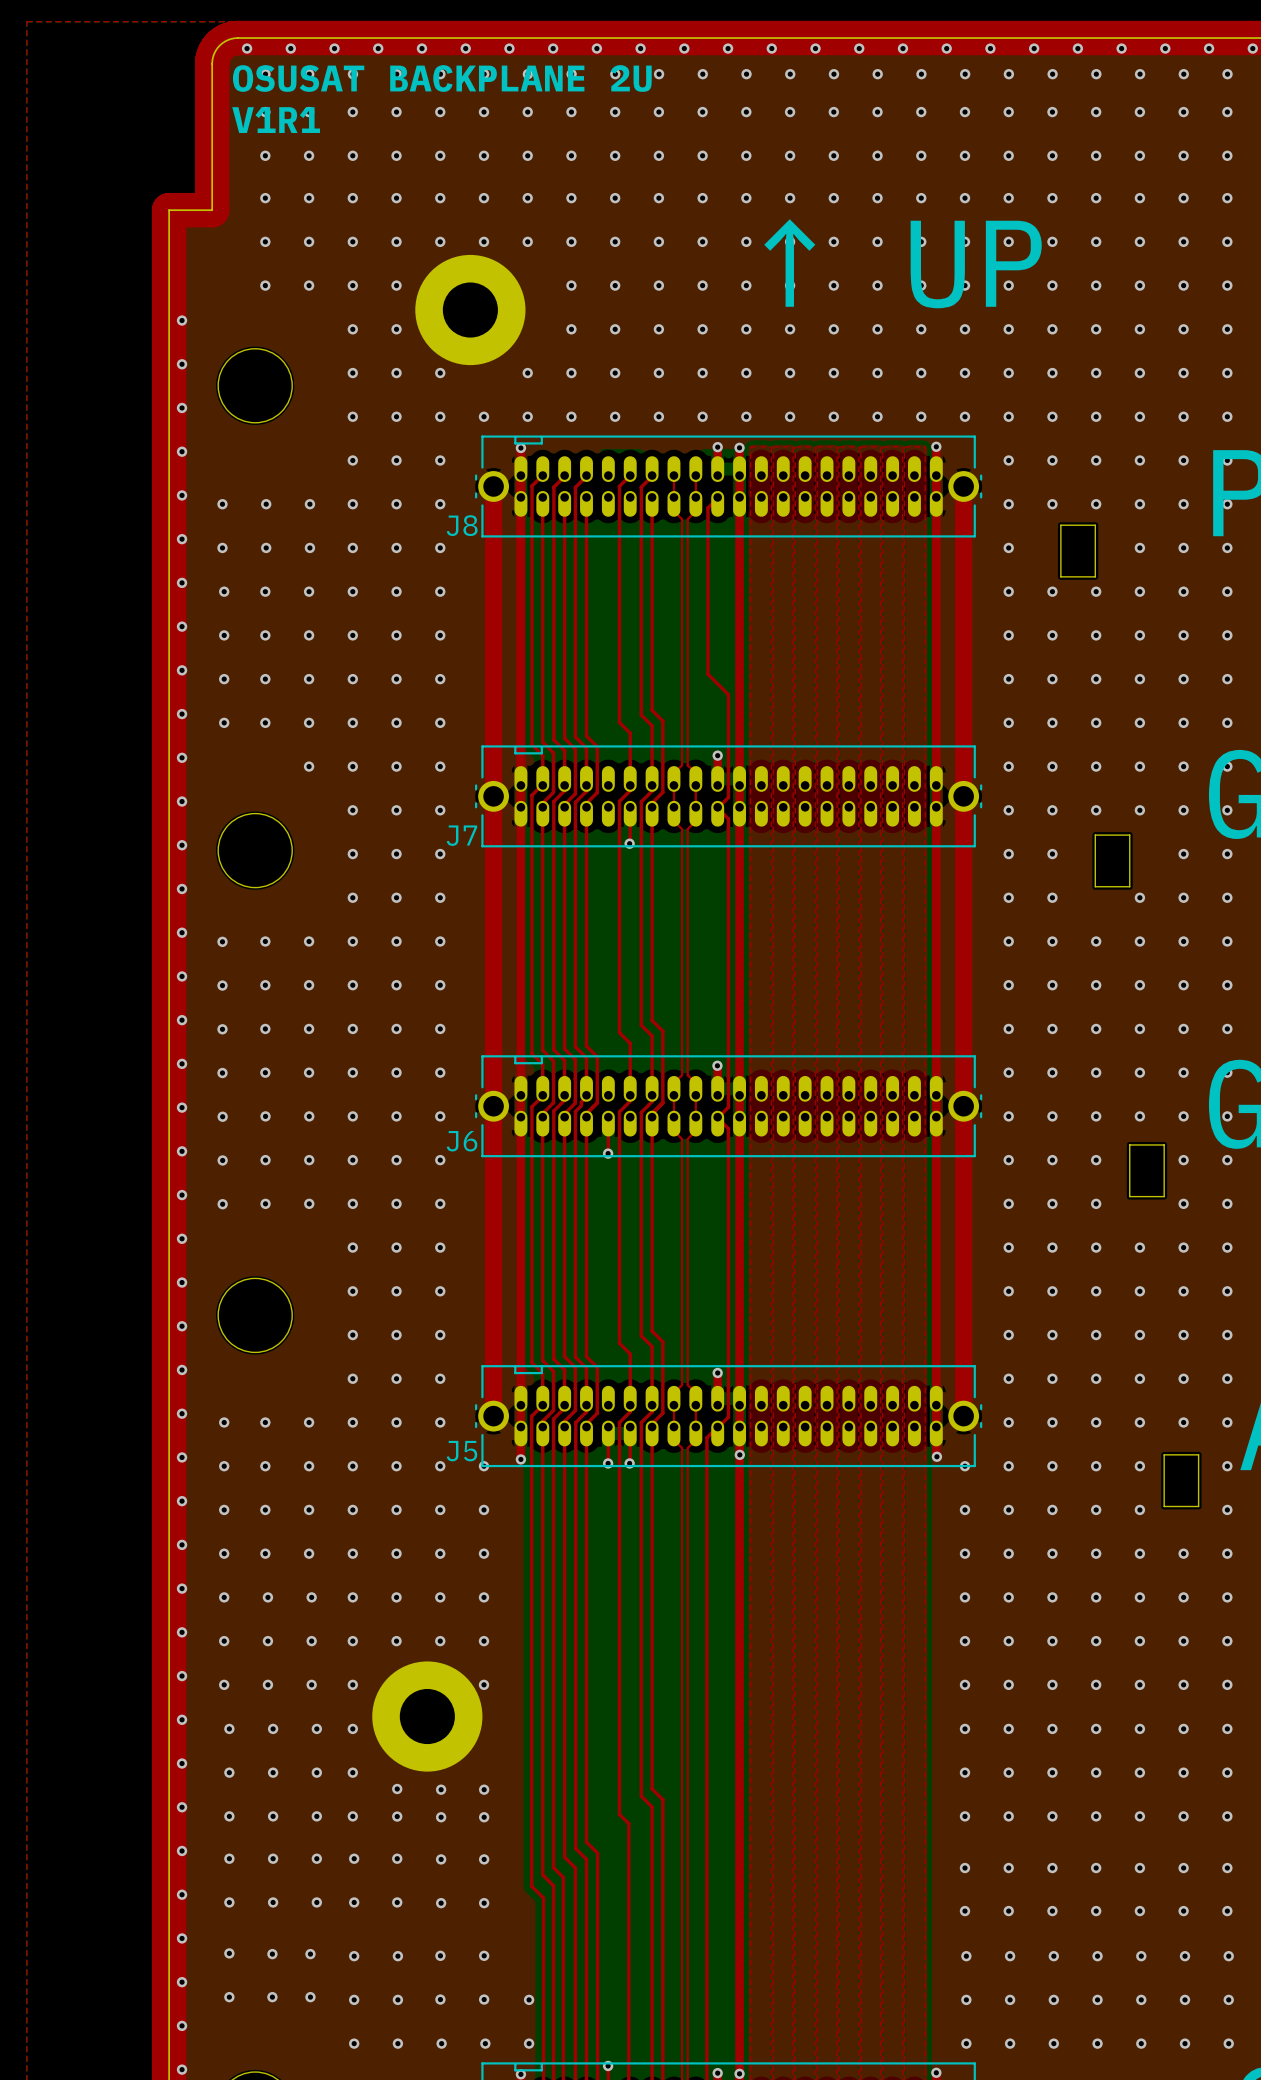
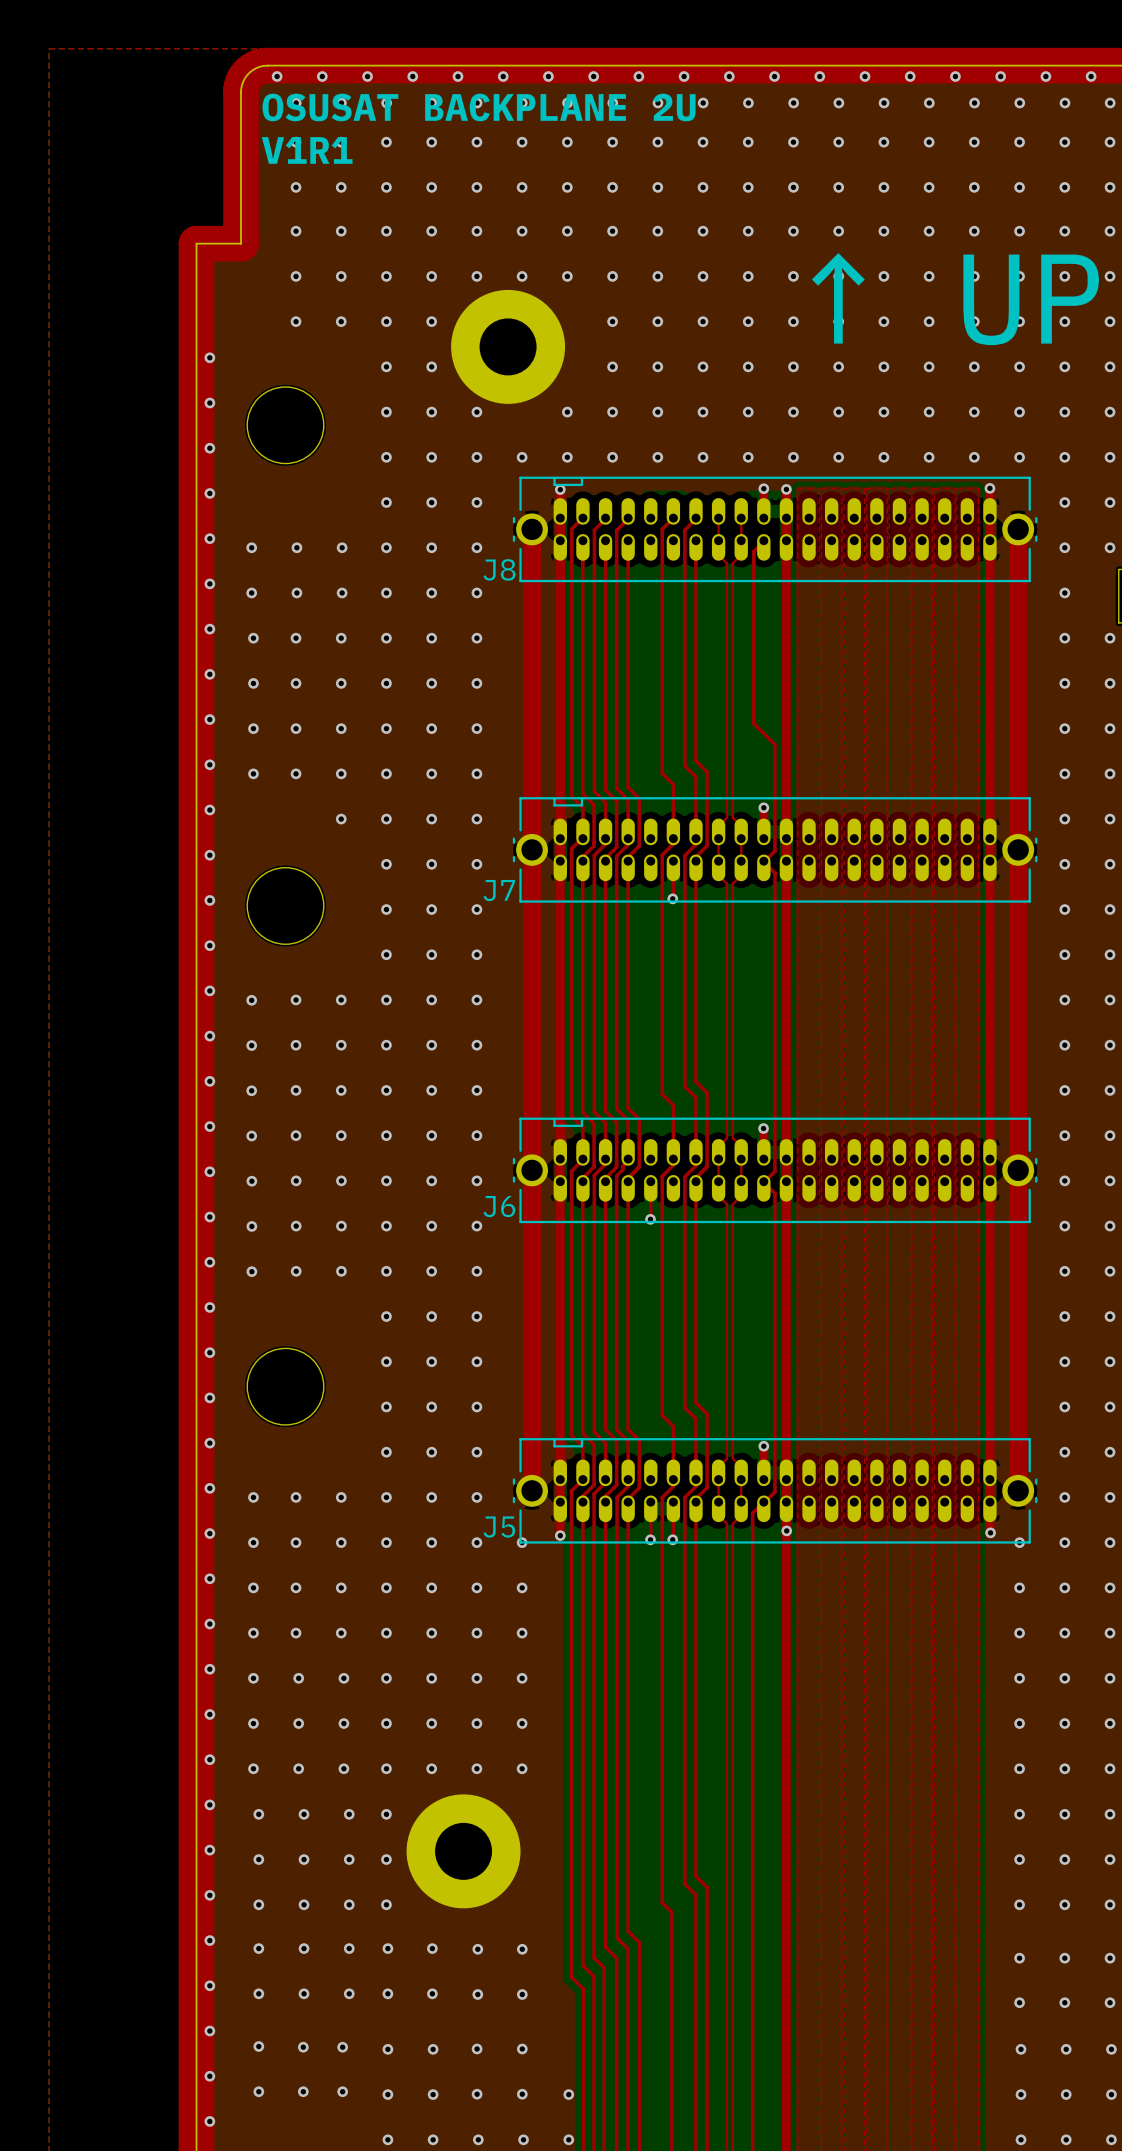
via: none -> (431, 1768)
via: none -> (476, 1768)
part position: (427, 1716) -> (463, 1851)
via: (397, 1789) -> none
via: (441, 1789) -> none
via: (484, 1789) -> none
via: (397, 1816) -> none
via: (441, 1817) -> none
via: (484, 1817) -> none

